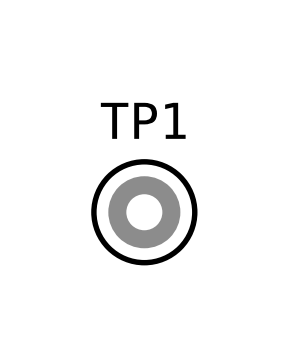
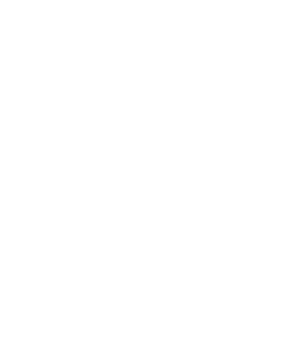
TP1: (144, 212) -> none

